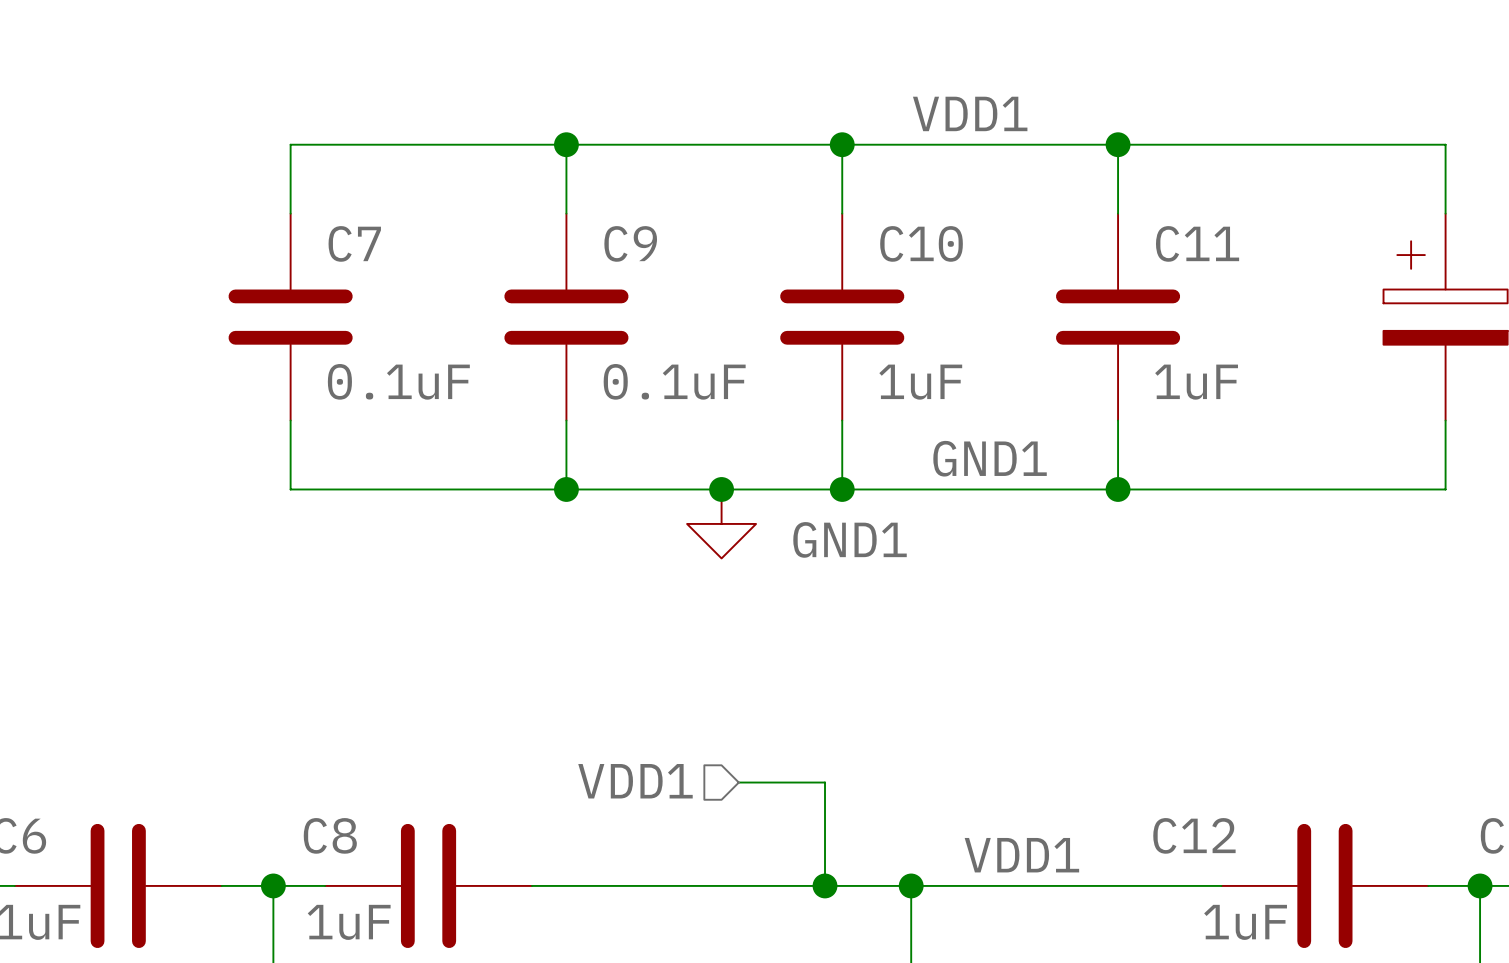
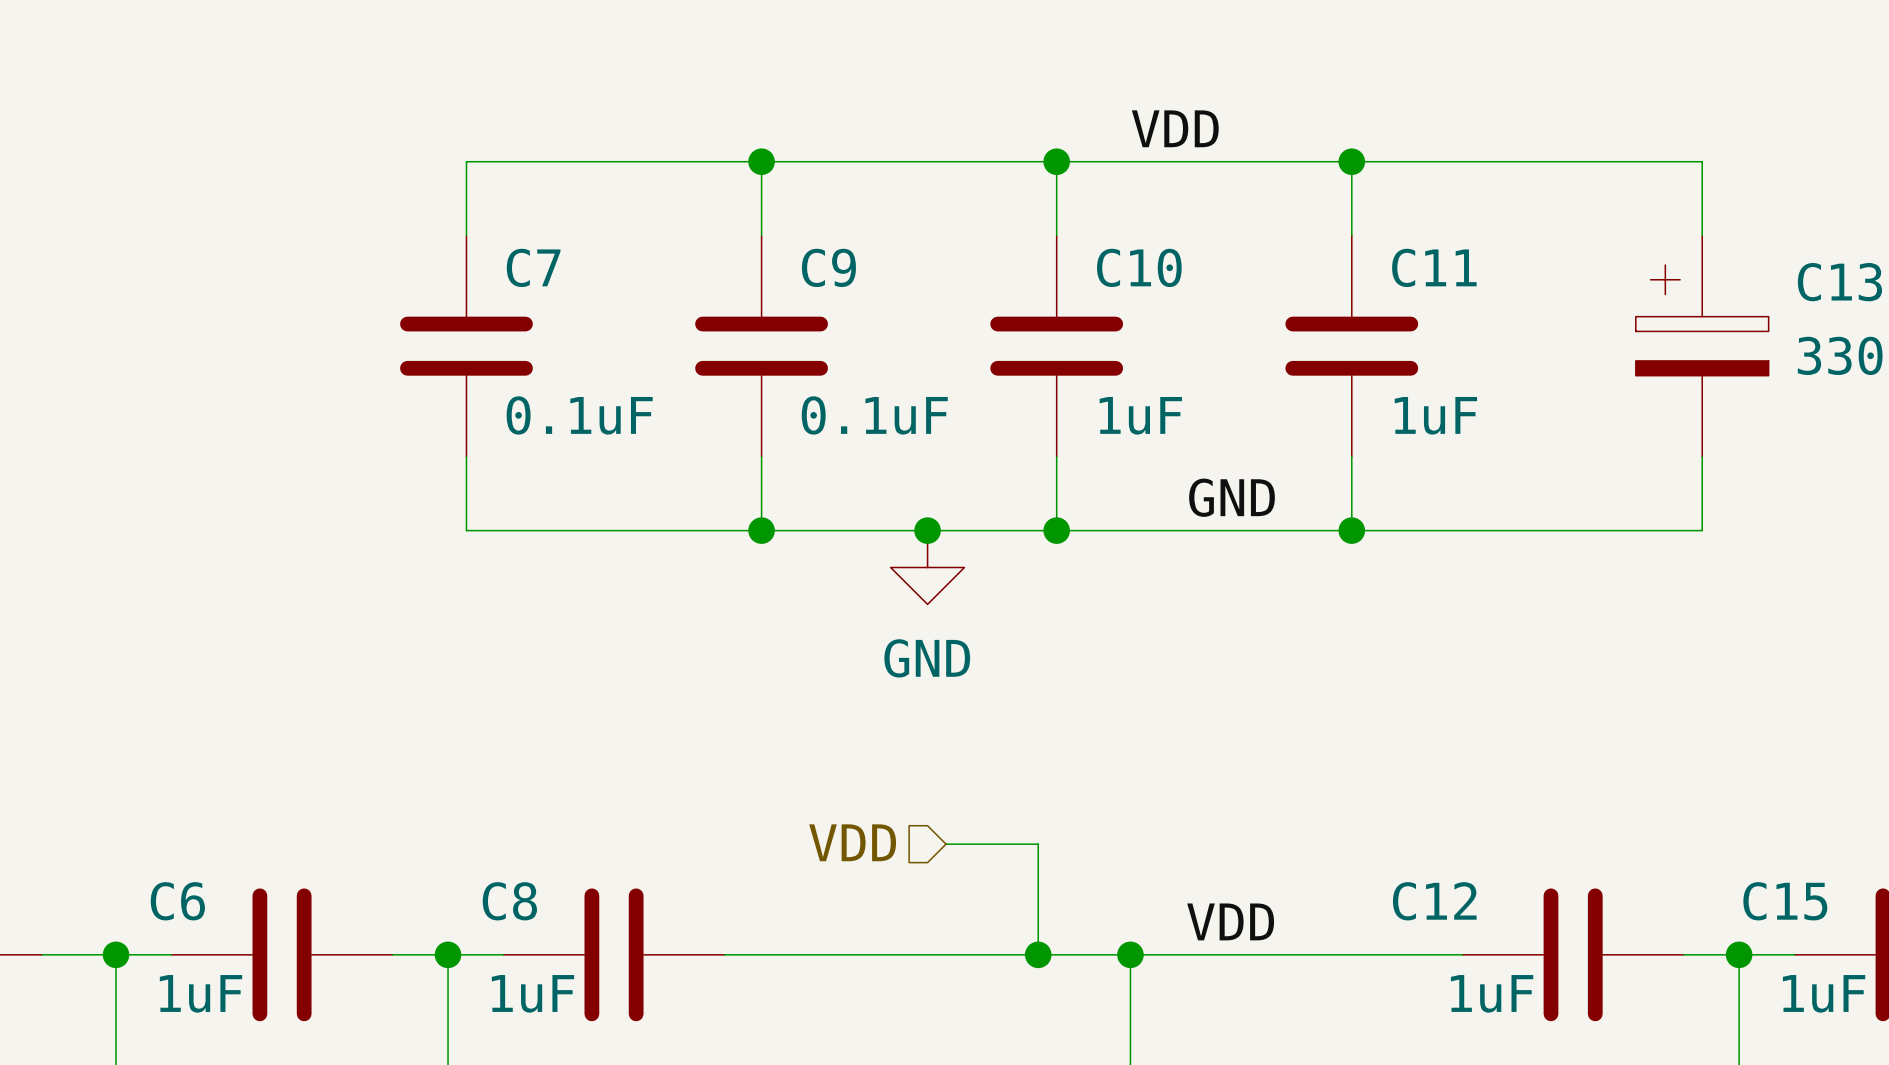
label: VDD1 (970, 113) -> VDD (1175, 128)
label: GND1 (990, 458) -> GND (1232, 497)
power symbol: GND1 (721, 523) -> GND (927, 567)
hierarchical label: VDD1 (635, 781) -> VDD (852, 842)
label: VDD1 (1021, 855) -> VDD (1230, 921)

